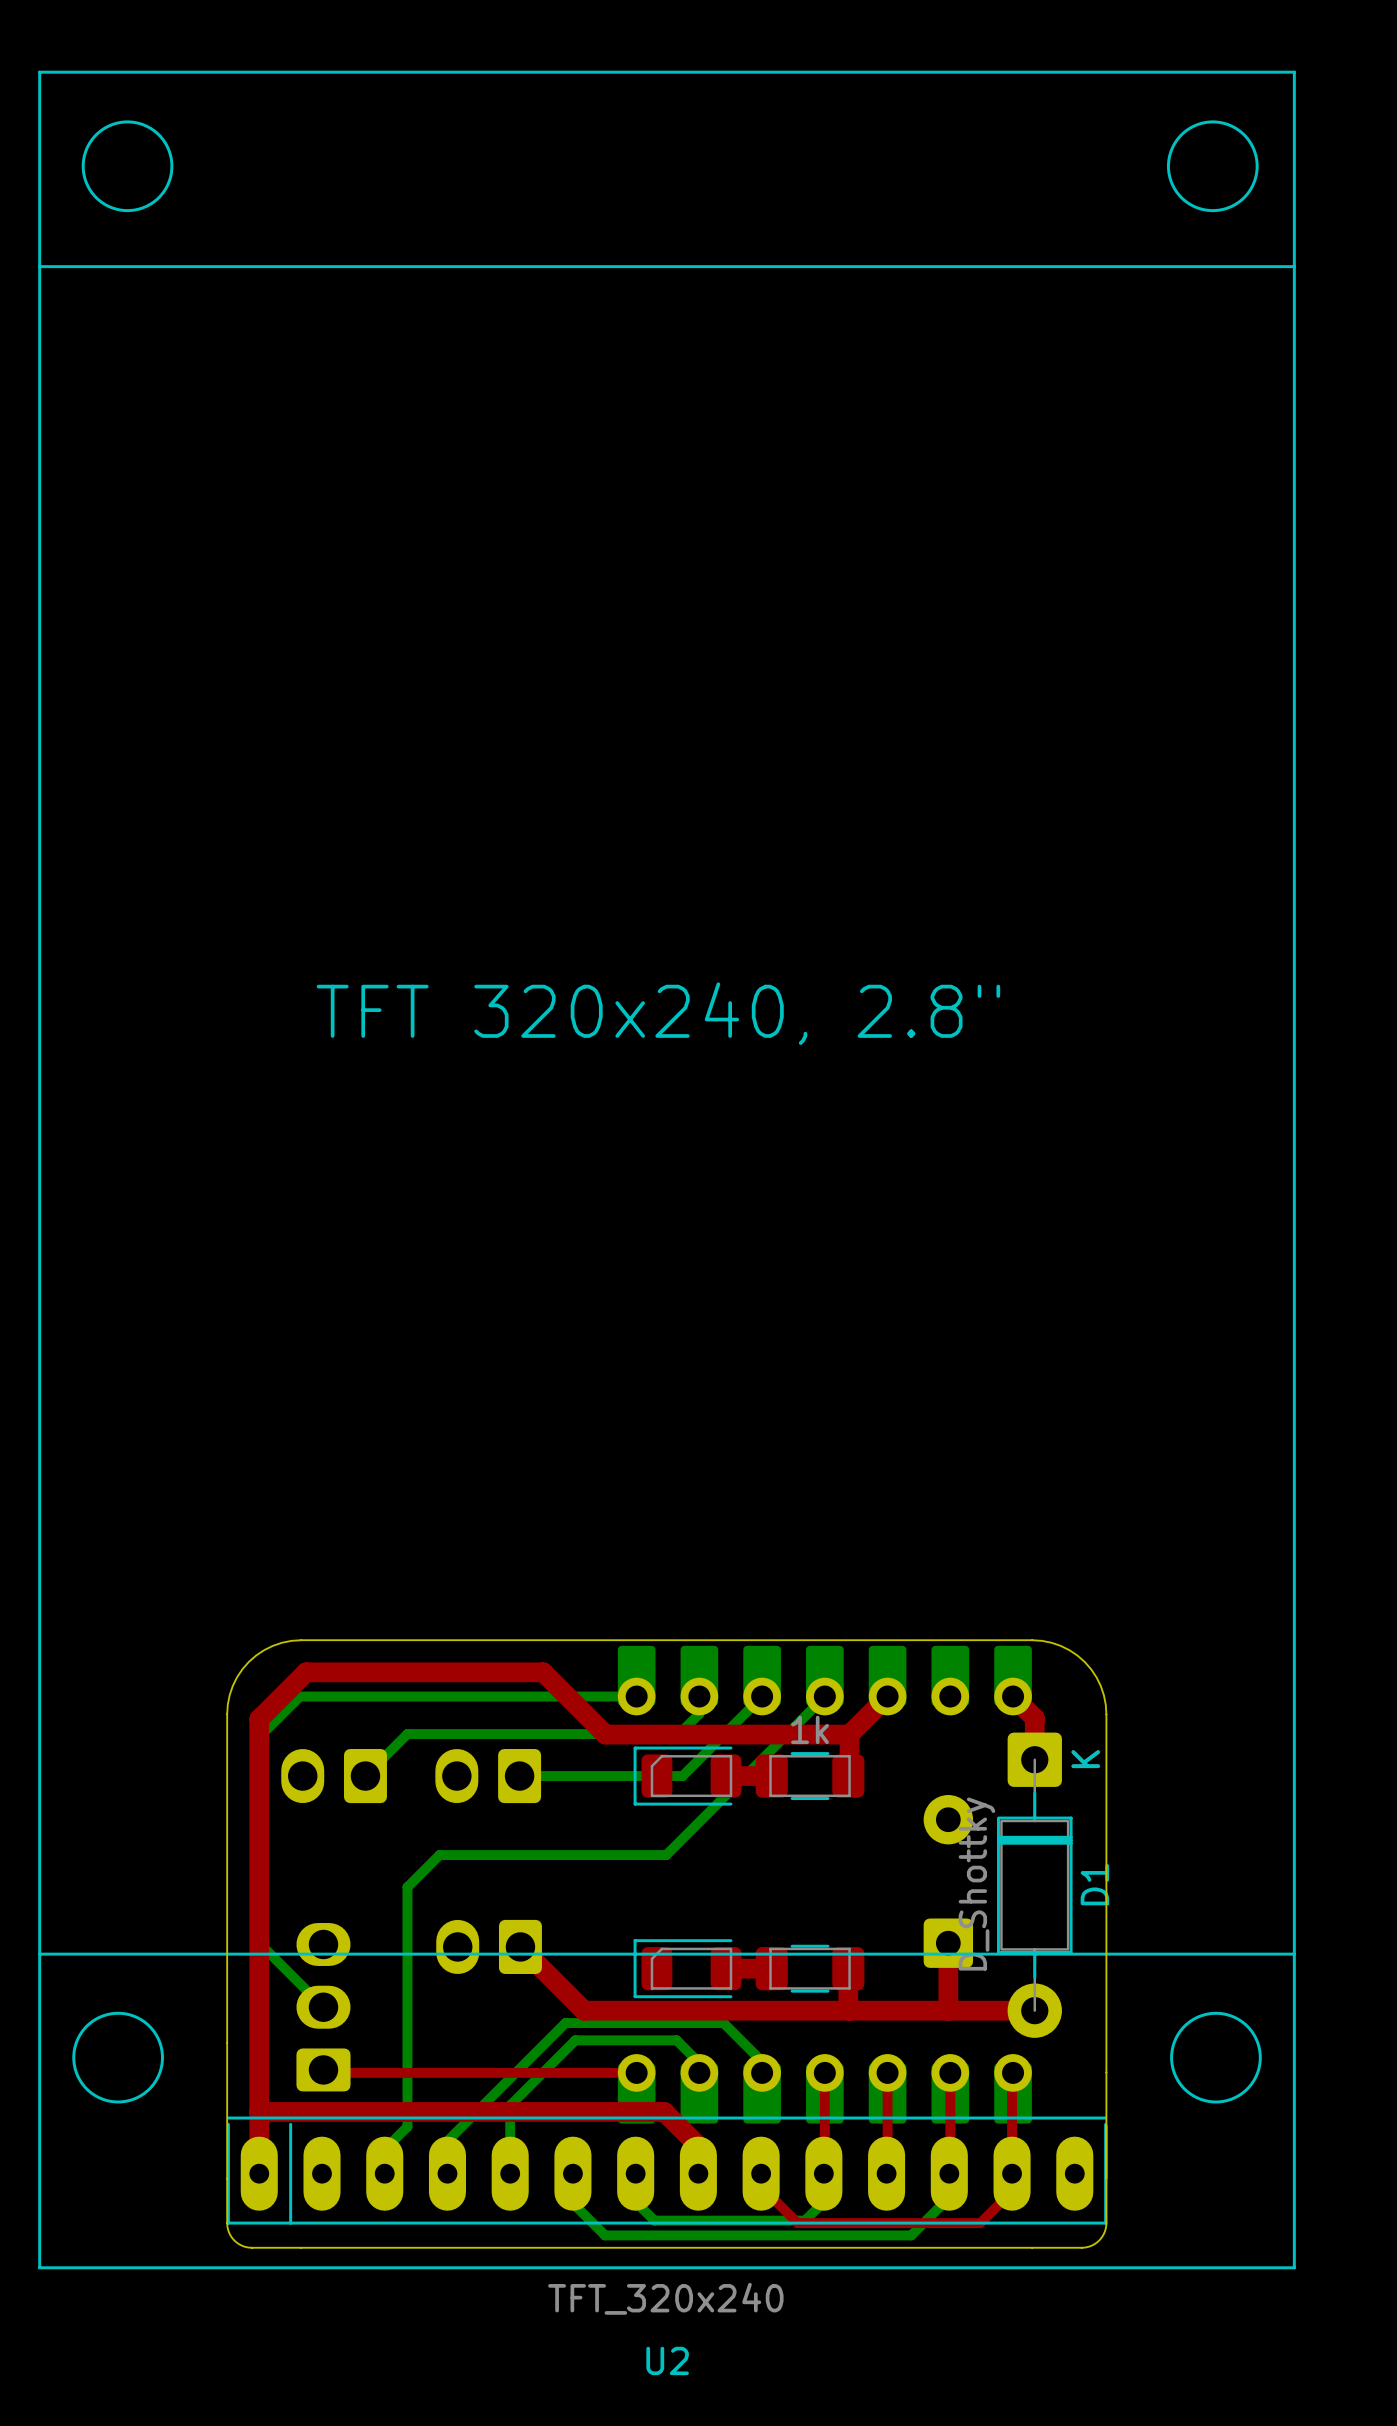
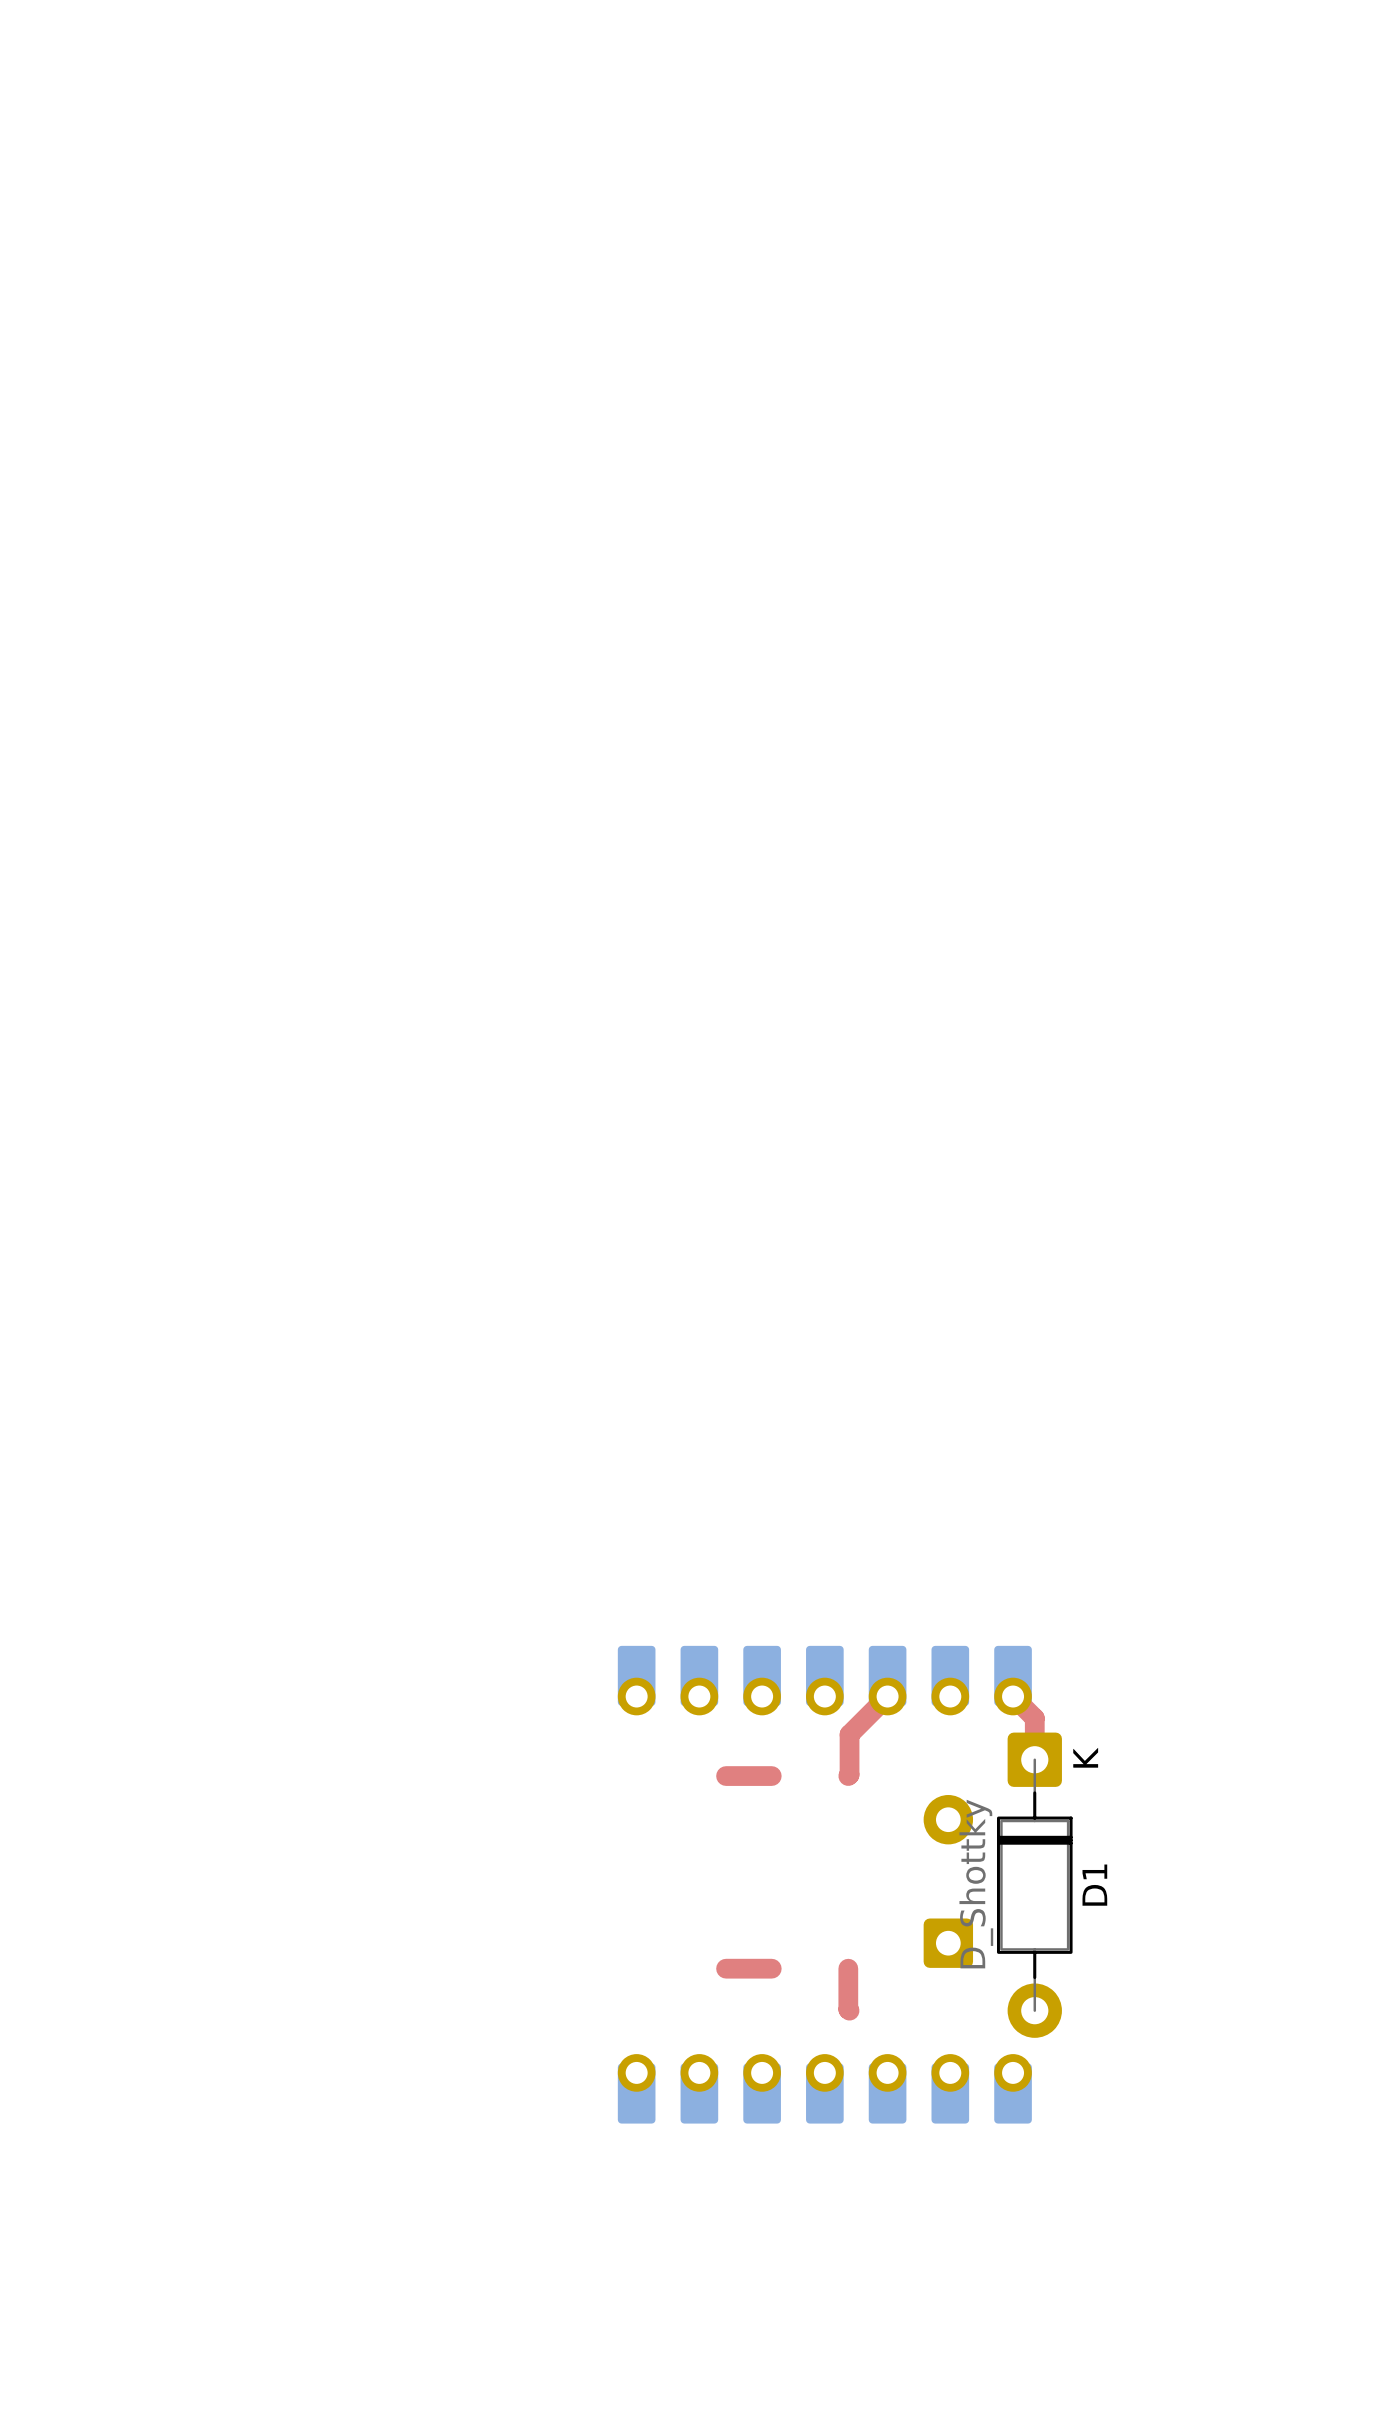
U2: TFT_320x240 (667, 1169) -> none
board edge: (301, 1640) (1032, 1640) (1060, 1645) (1077, 1655) (1091, 1669) (1100, 1685) (1106, 1714) (1106, 2223) (1101, 2238) (1092, 2245) (1081, 2247) (251, 2247) (236, 2242) (229, 2233) (227, 2223) (227, 1704) (232, 1685) (248, 1661) (272, 1645) (301, 1640) -> none
bottom track: (636, 1696) (299, 1696) (261, 1734) (261, 1945) (323, 2007) -> none
bottom track: (699, 1696) (699, 1713) (679, 1734) (407, 1734) (365, 1776) -> none
bottom track: (762, 1696) (682, 1776) (519, 1776) -> none
bottom track: (824, 1696) (666, 1855) (439, 1855) (407, 1887) (407, 2126) (384, 2149) (384, 2173) -> none
top track: (849, 1734) (605, 1734) (543, 1672) (306, 1672) (259, 1719) (259, 2173) -> none
part: (334, 1776) -> none
part: (488, 1776) -> none
part: (687, 1776) -> none
part: 1k (810, 1776) -> none
top track: (948, 1943) (948, 2010) -> none
part: (489, 1946) -> none
top track: (520, 1946) (584, 2010) (1034, 2010) -> none
part: (687, 1968) -> none
part: (810, 1968) -> none
part: (323, 2007) -> none
top track: (323, 2069) (326, 2072) (636, 2072) -> none
bottom track: (699, 2072) (699, 2063) (676, 2040) (575, 2040) (510, 2105) (510, 2173) -> none
bottom track: (762, 2072) (762, 2061) (723, 2023) (565, 2023) (447, 2141) (447, 2173) -> none
top track: (824, 2072) (823, 2173) -> none
top track: (887, 2072) (886, 2173) -> none
top track: (950, 2072) (949, 2173) -> none
top track: (1013, 2072) (1012, 2191) (980, 2223) (797, 2223) (761, 2186) (761, 2173) -> none
top track: (259, 2111) (664, 2111) (698, 2146) (698, 2173) -> none
bottom track: (572, 2173) (570, 2176) (570, 2200) (605, 2235) (911, 2235) (949, 2197) (949, 2173) -> none
bottom track: (635, 2173) (635, 2201) (654, 2220) (805, 2220) (823, 2201) (823, 2173) -> none

